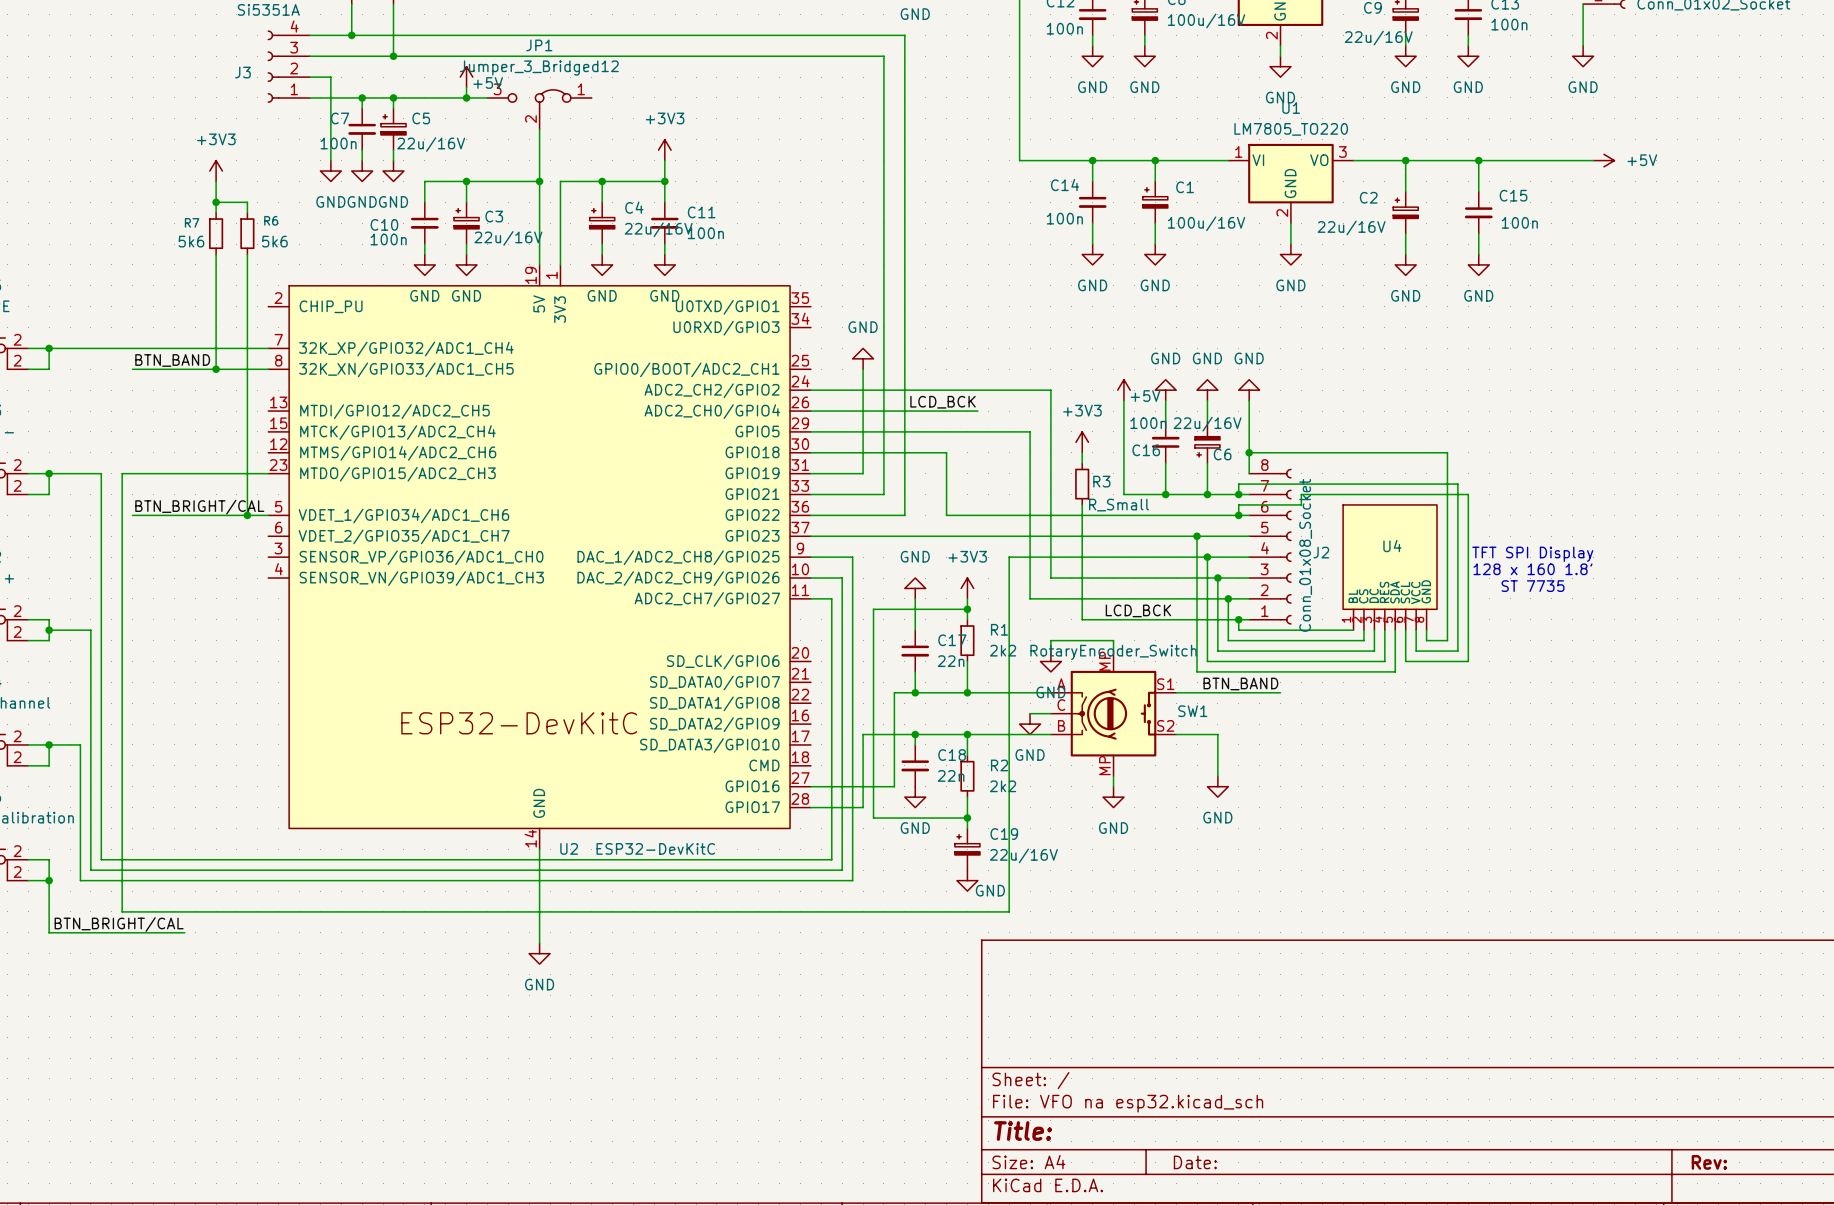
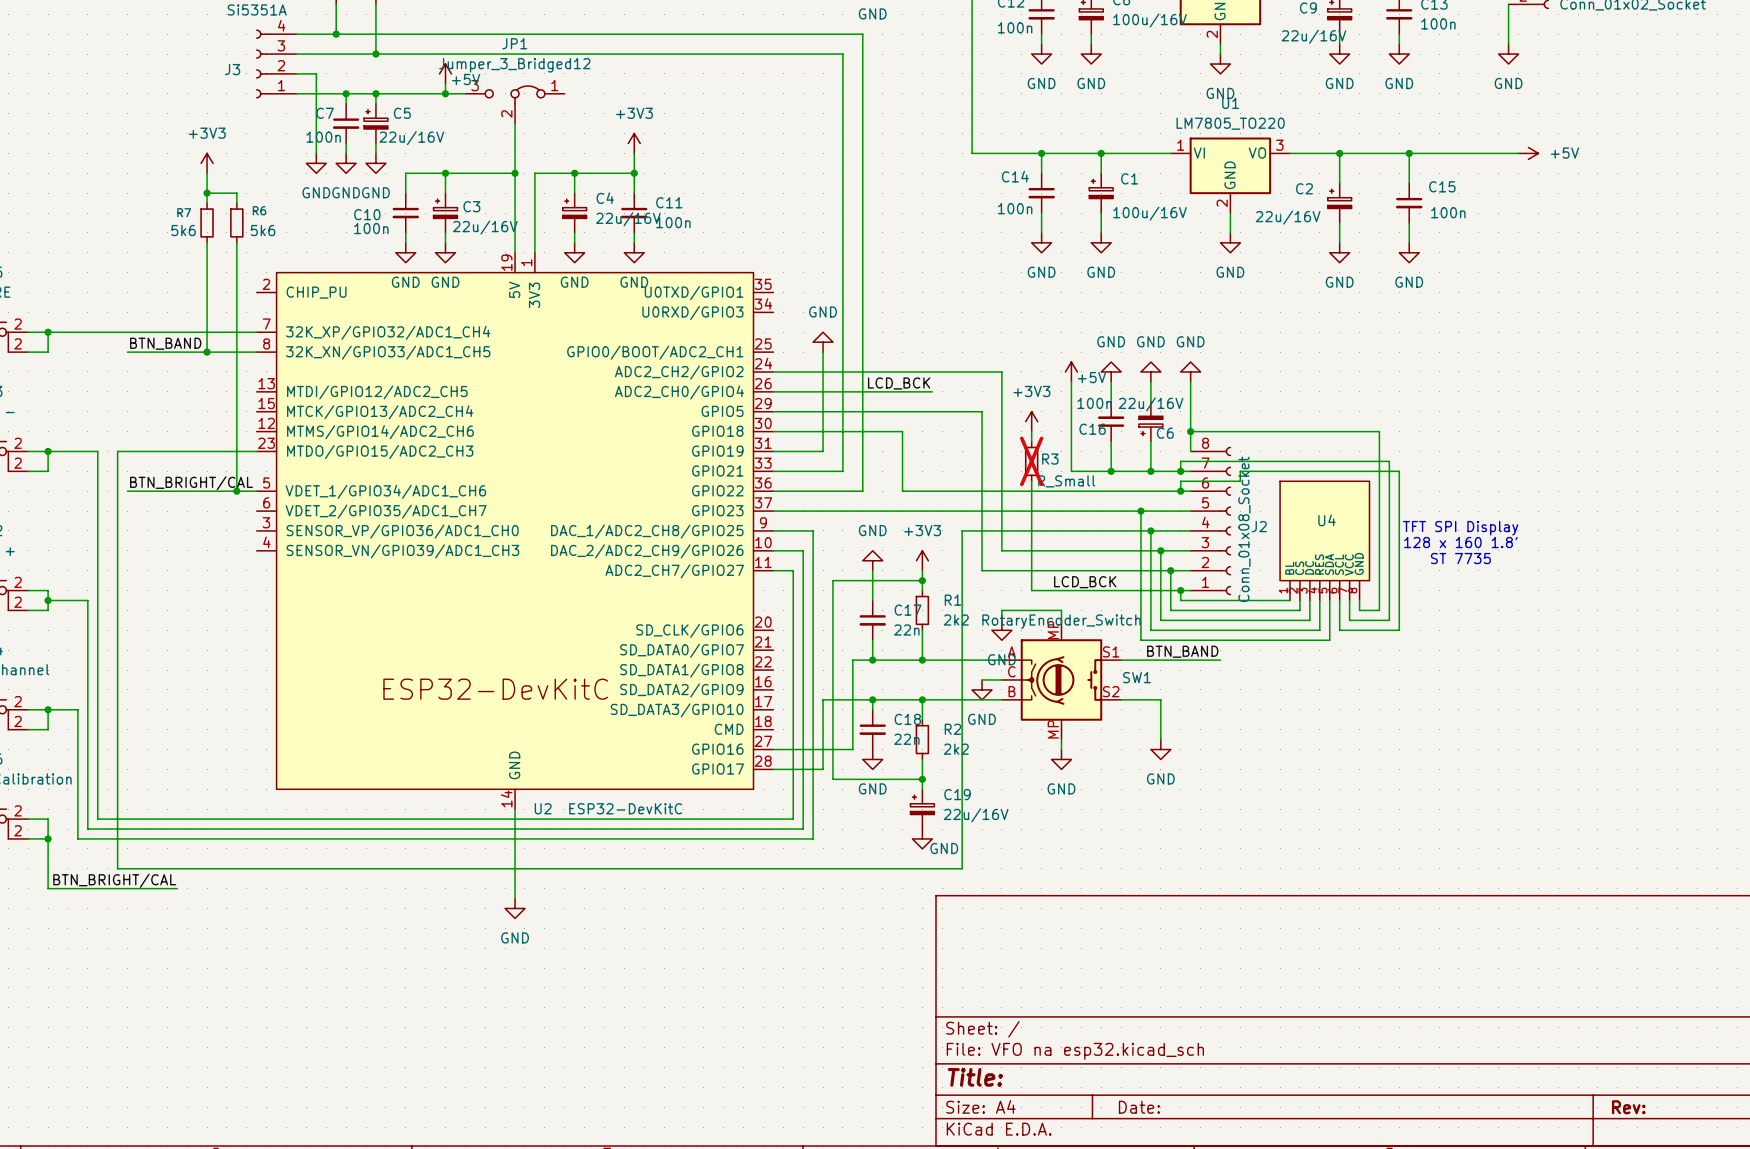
R3 do-not-place cross: none -> (1031, 461)

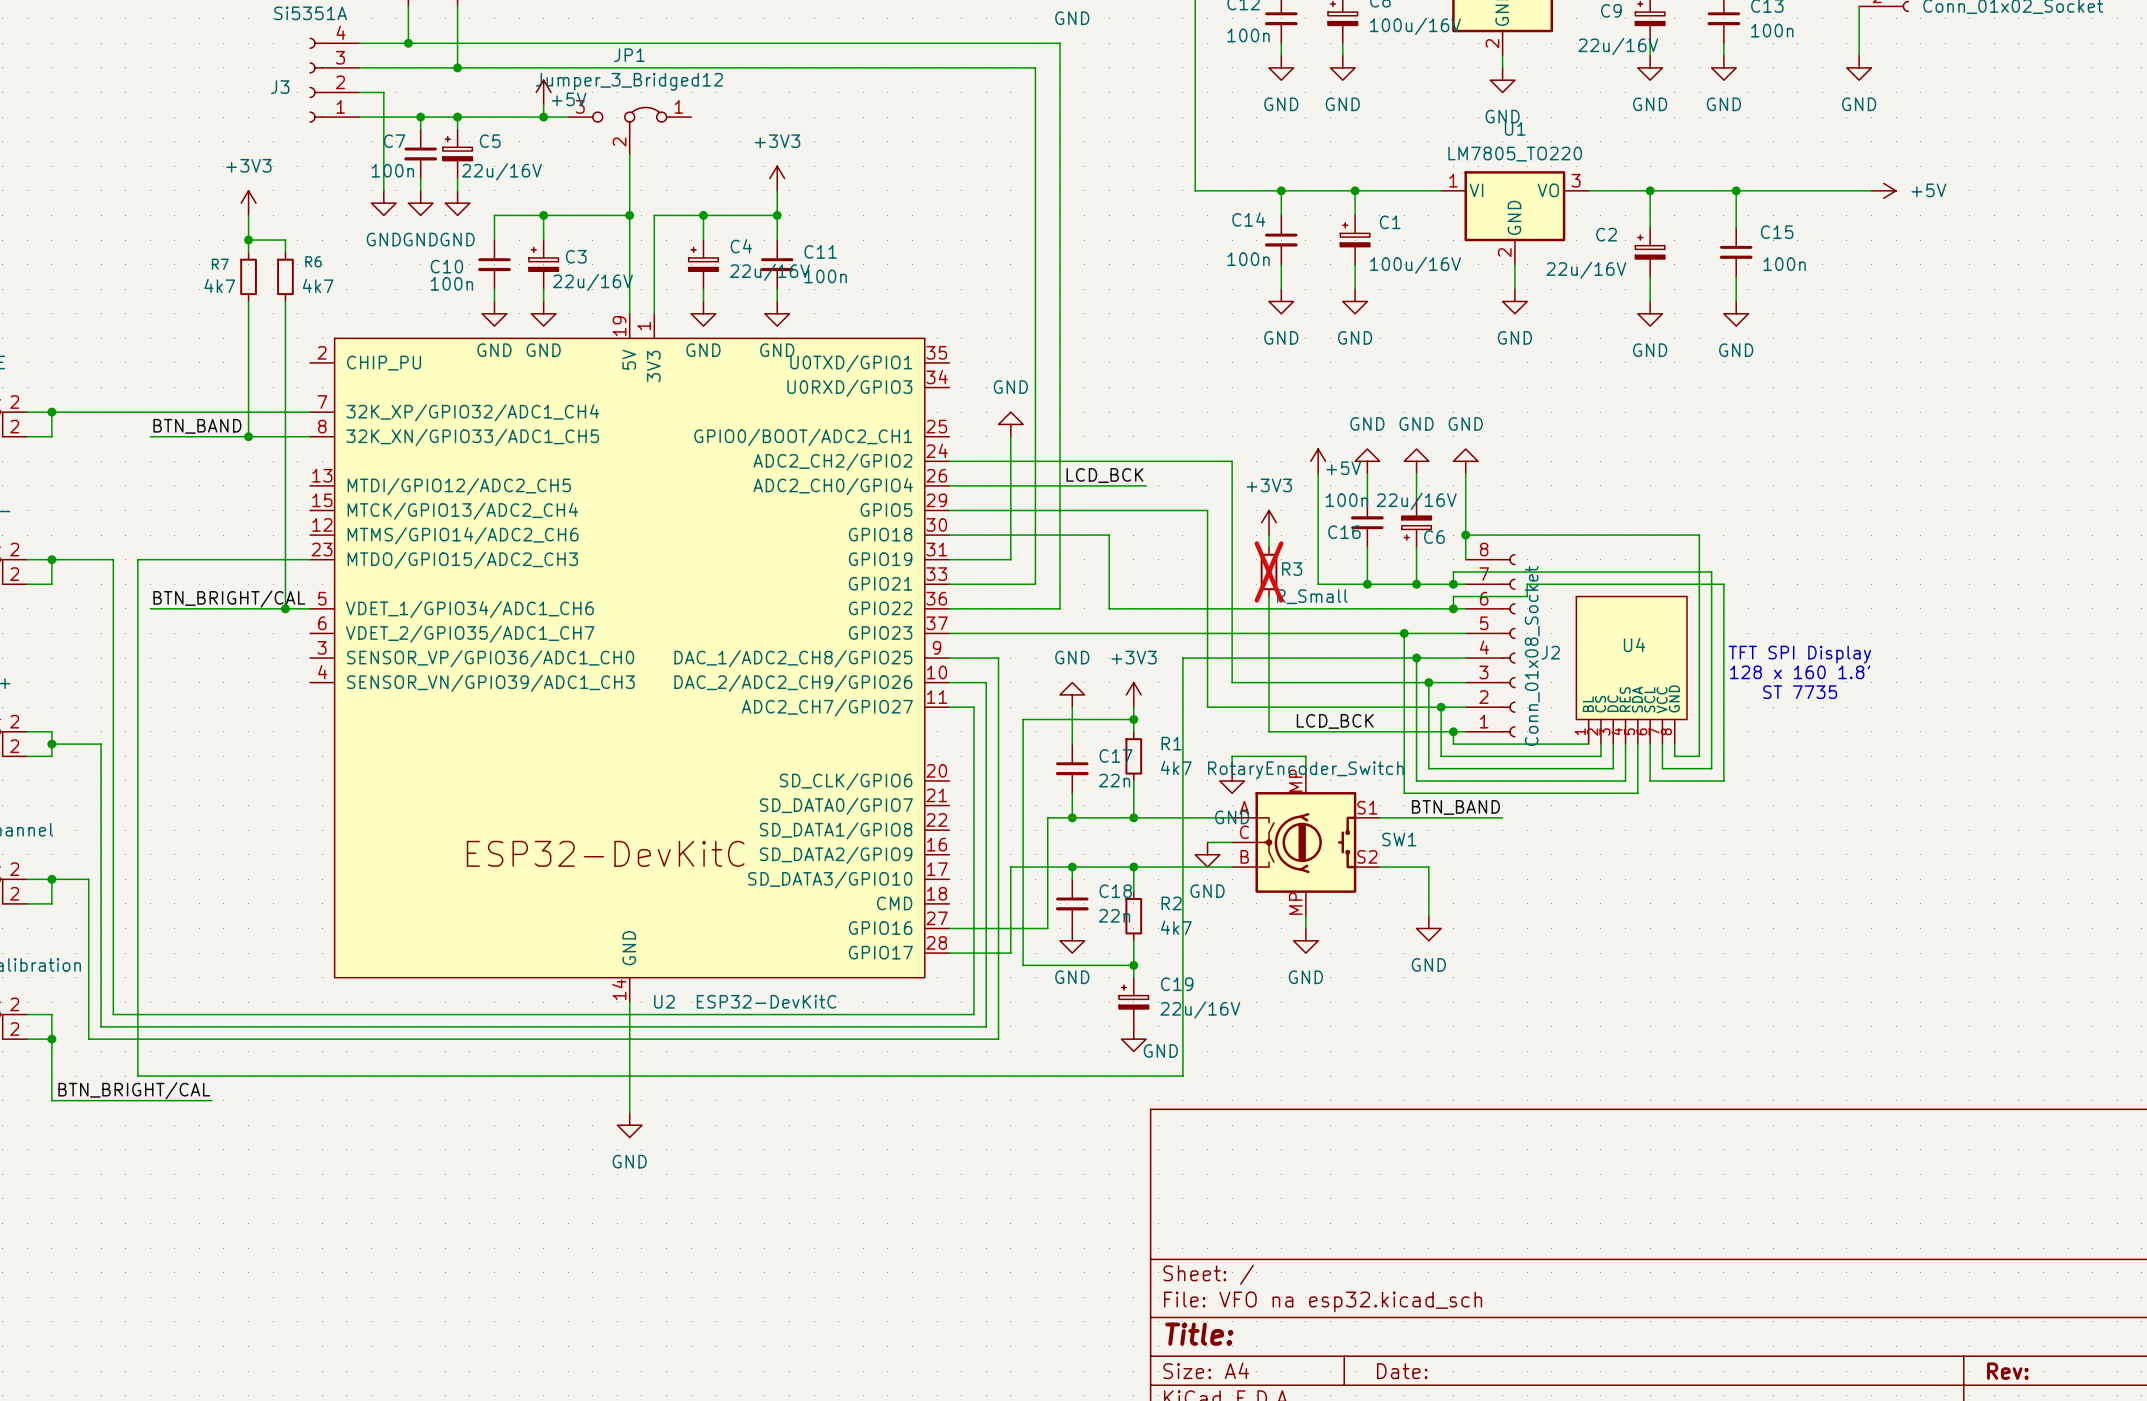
R7 value: 5k6 (183, 230) -> 4k7 (219, 285)
R6 value: 5k6 (263, 230) -> 4k7 (318, 285)
R1 value: 2k2 (956, 620) -> 4k7 (1176, 767)
R2 value: 2k2 (956, 749) -> 4k7 (1176, 927)

